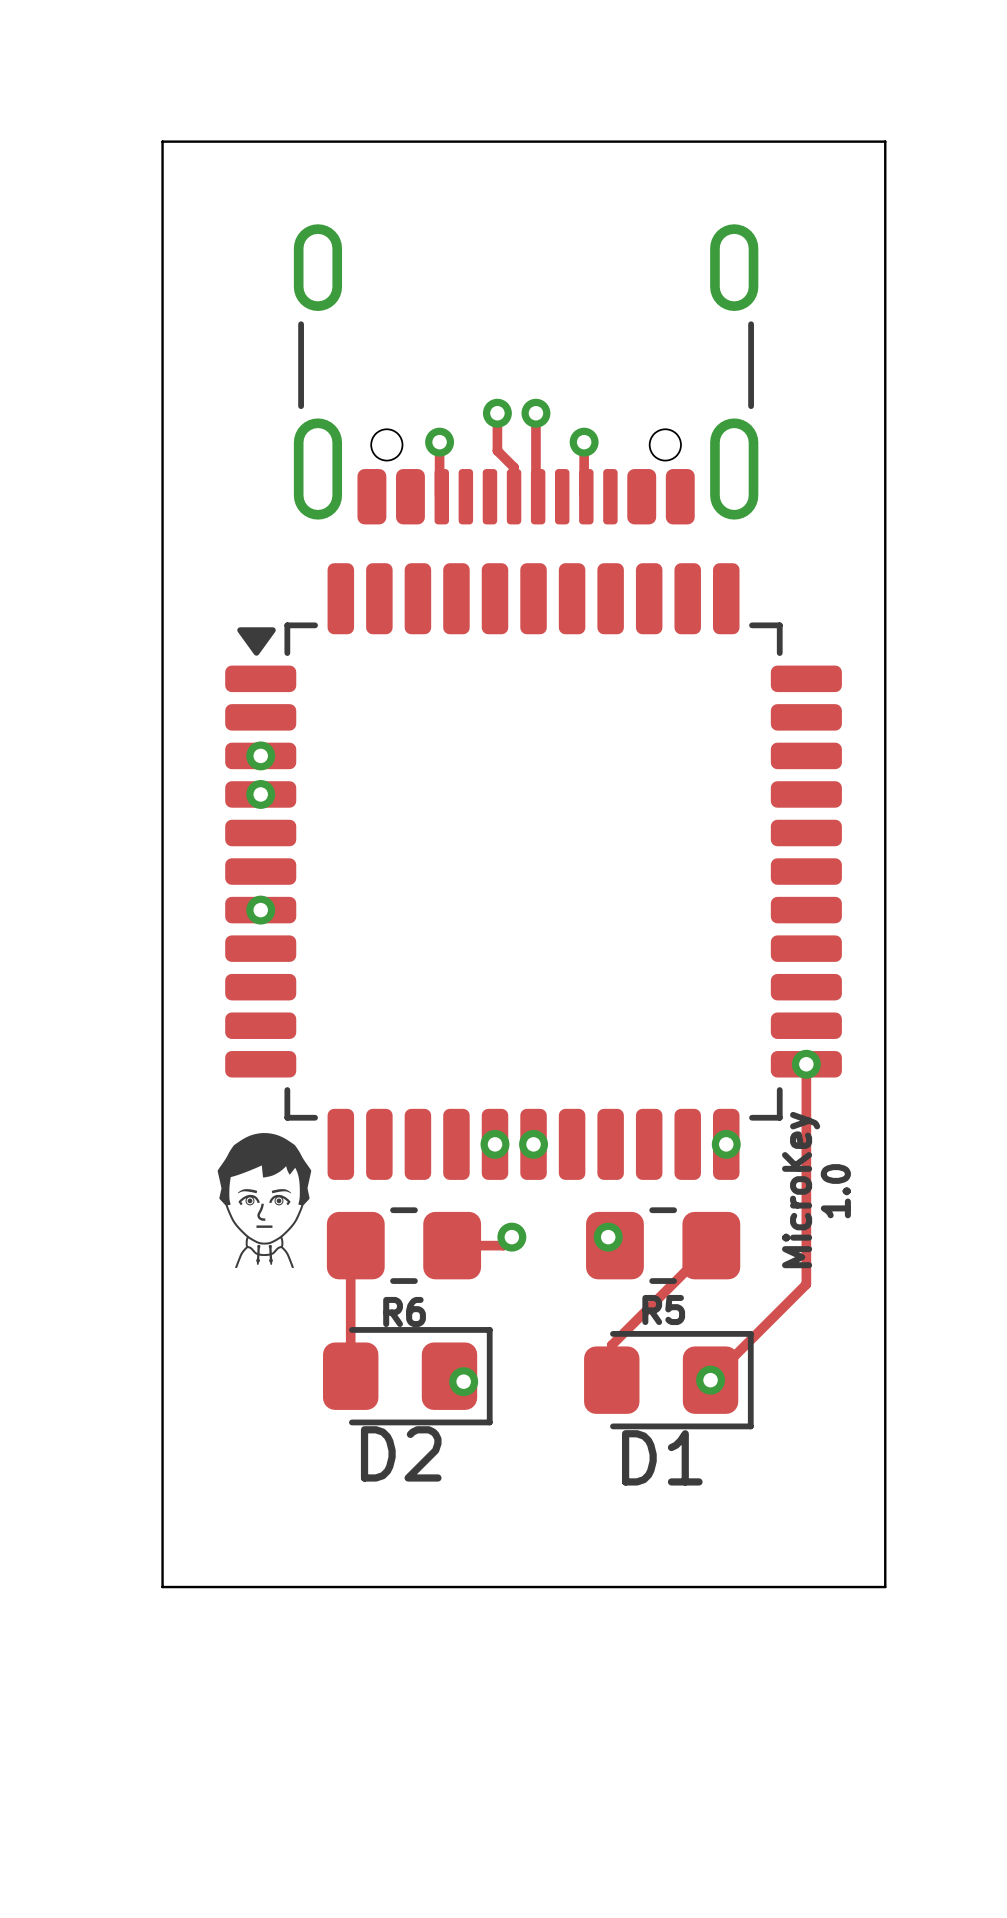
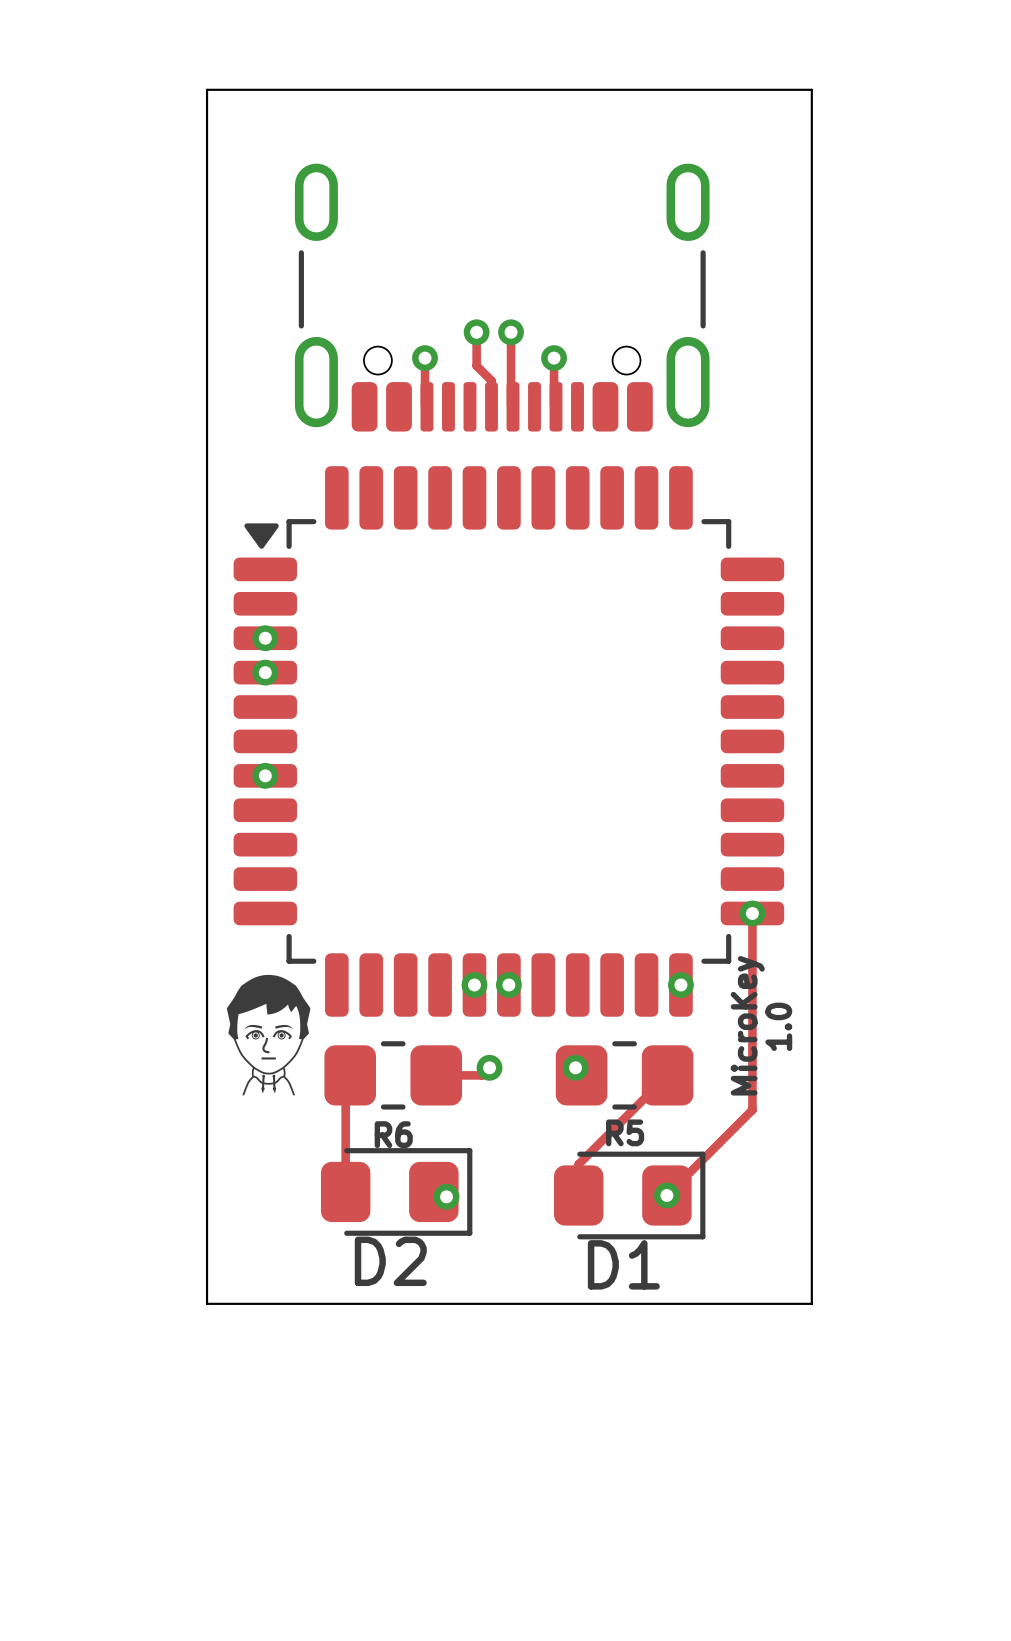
board edge: (195, 141) (162, 141) (162, 1587) (885, 1587) (885, 141) (872, 141) -> (207, 89) (207, 1303) (811, 1303) (811, 89)

